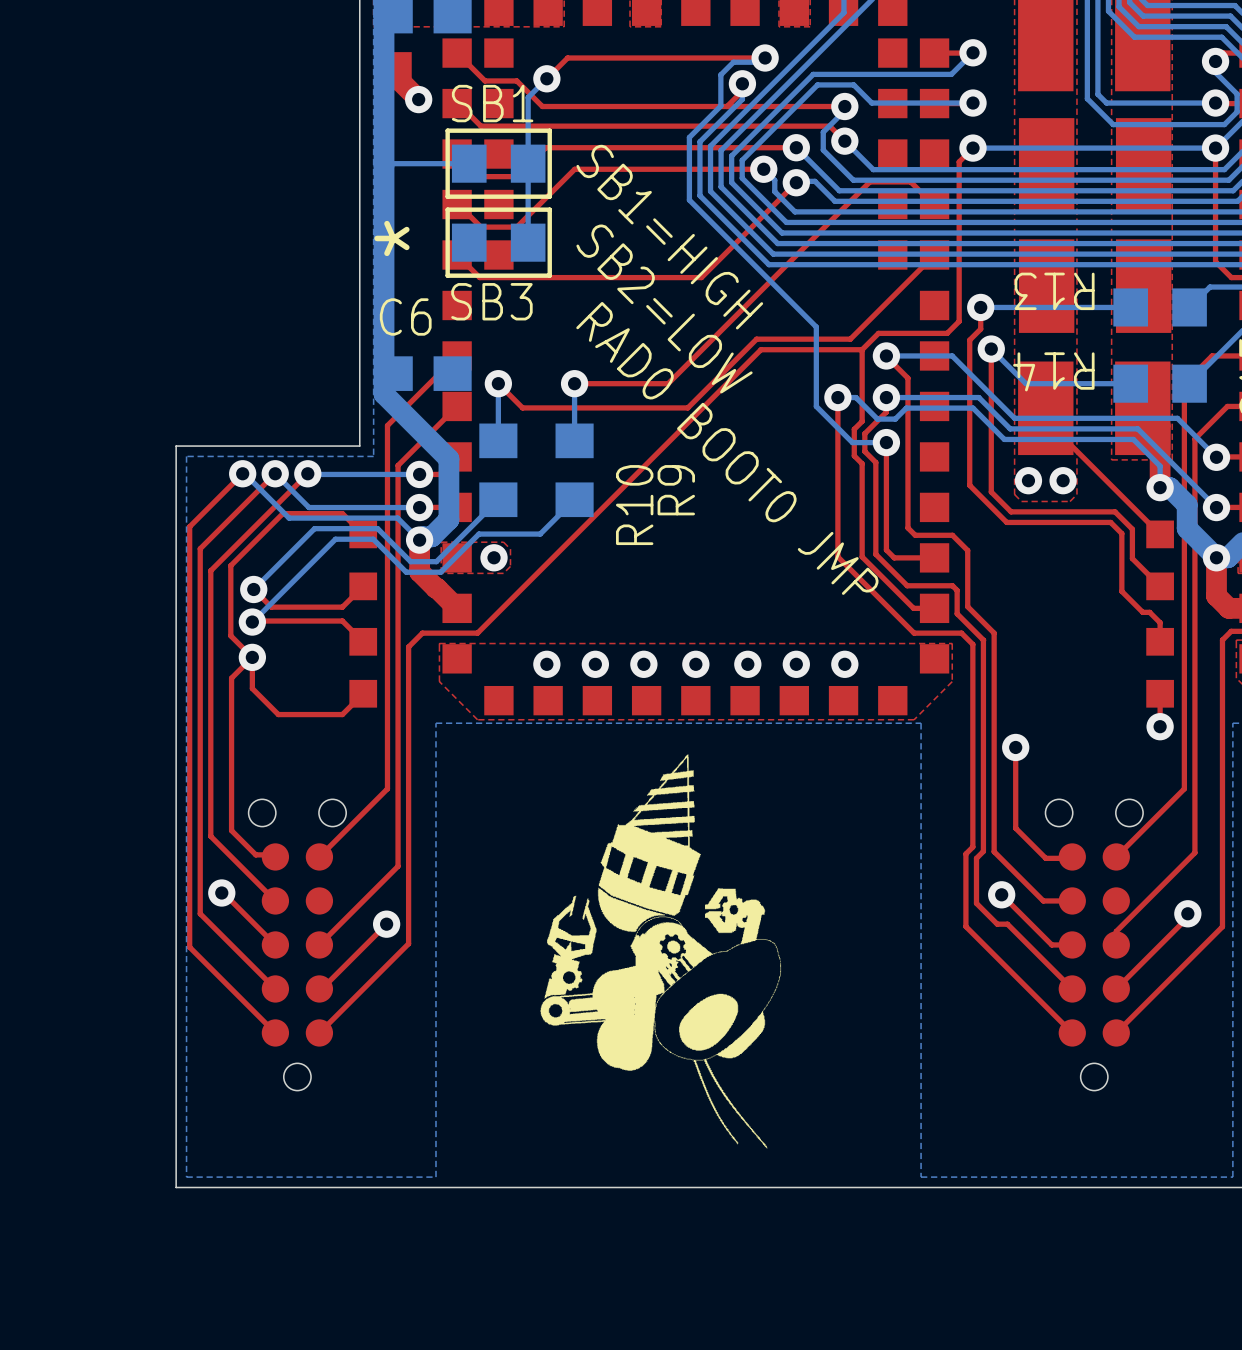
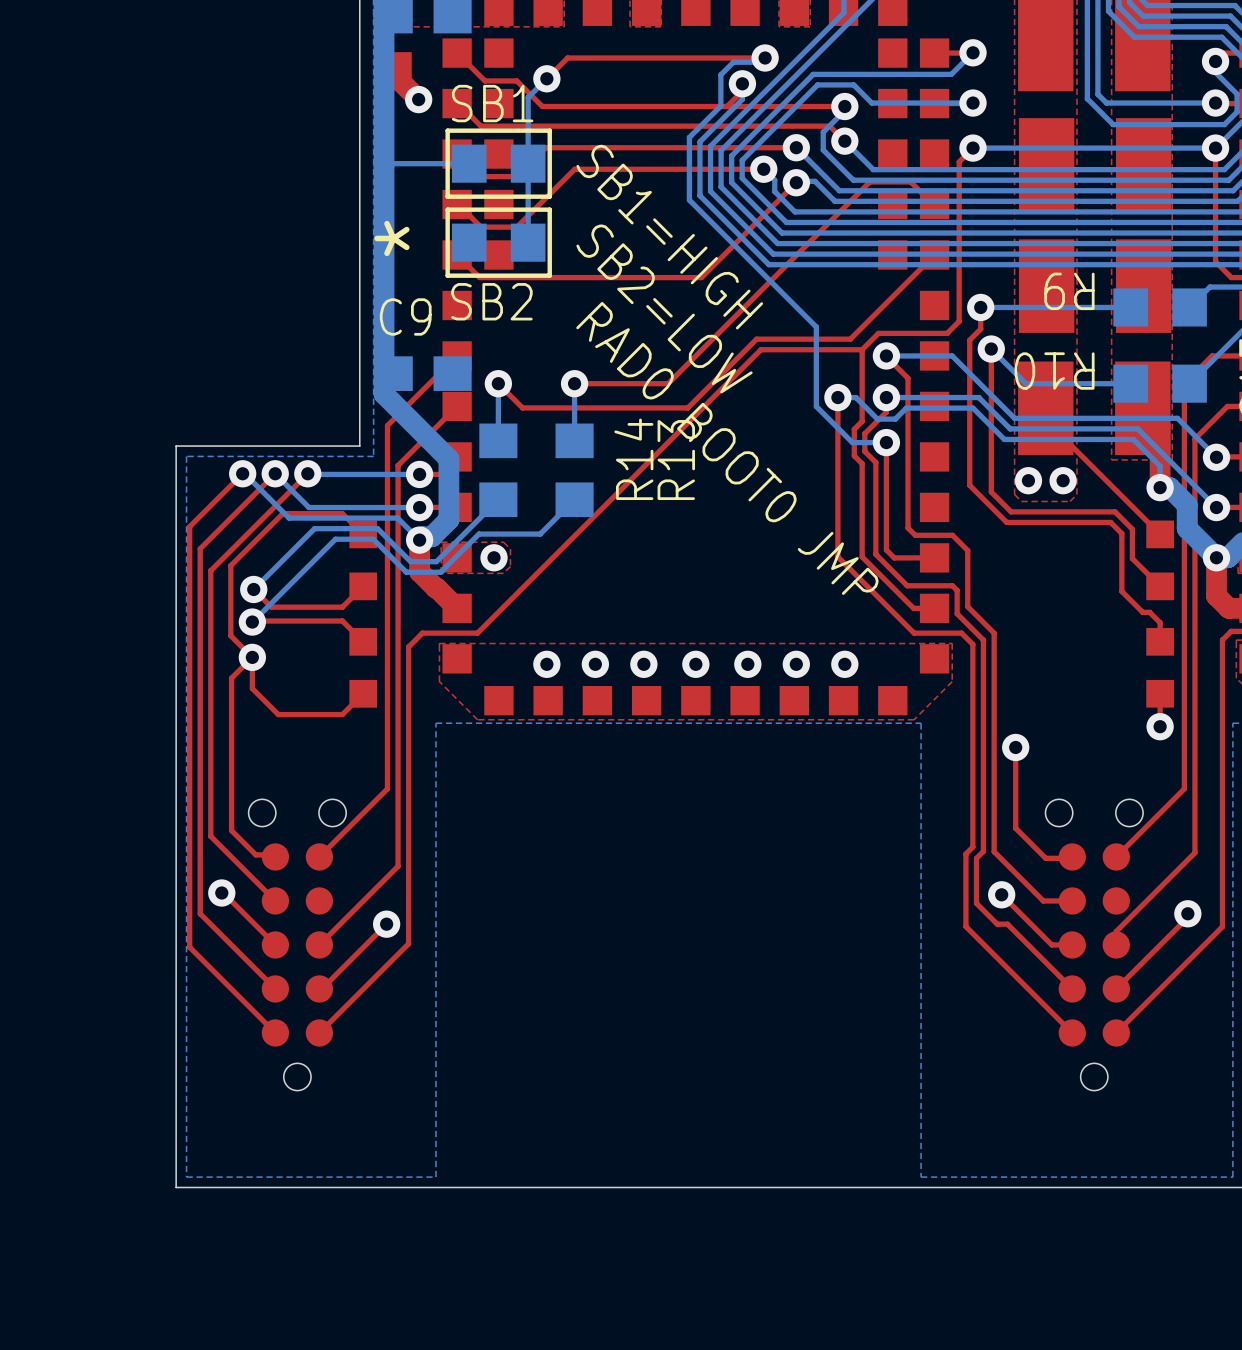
R13 name: R13 (1054, 291) -> R9 (1069, 291)
SB3 name: SB3 (491, 301) -> SB2 (491, 301)
C6 name: C6 (405, 316) -> C9 (405, 316)
R14 name: R14 (1053, 371) -> R10 (1054, 371)
R9 name: R9 (676, 490) -> R13 (676, 460)
R10 name: R10 (634, 505) -> R14 (633, 459)
drawing: [540, 754, 782, 1149] -> none

